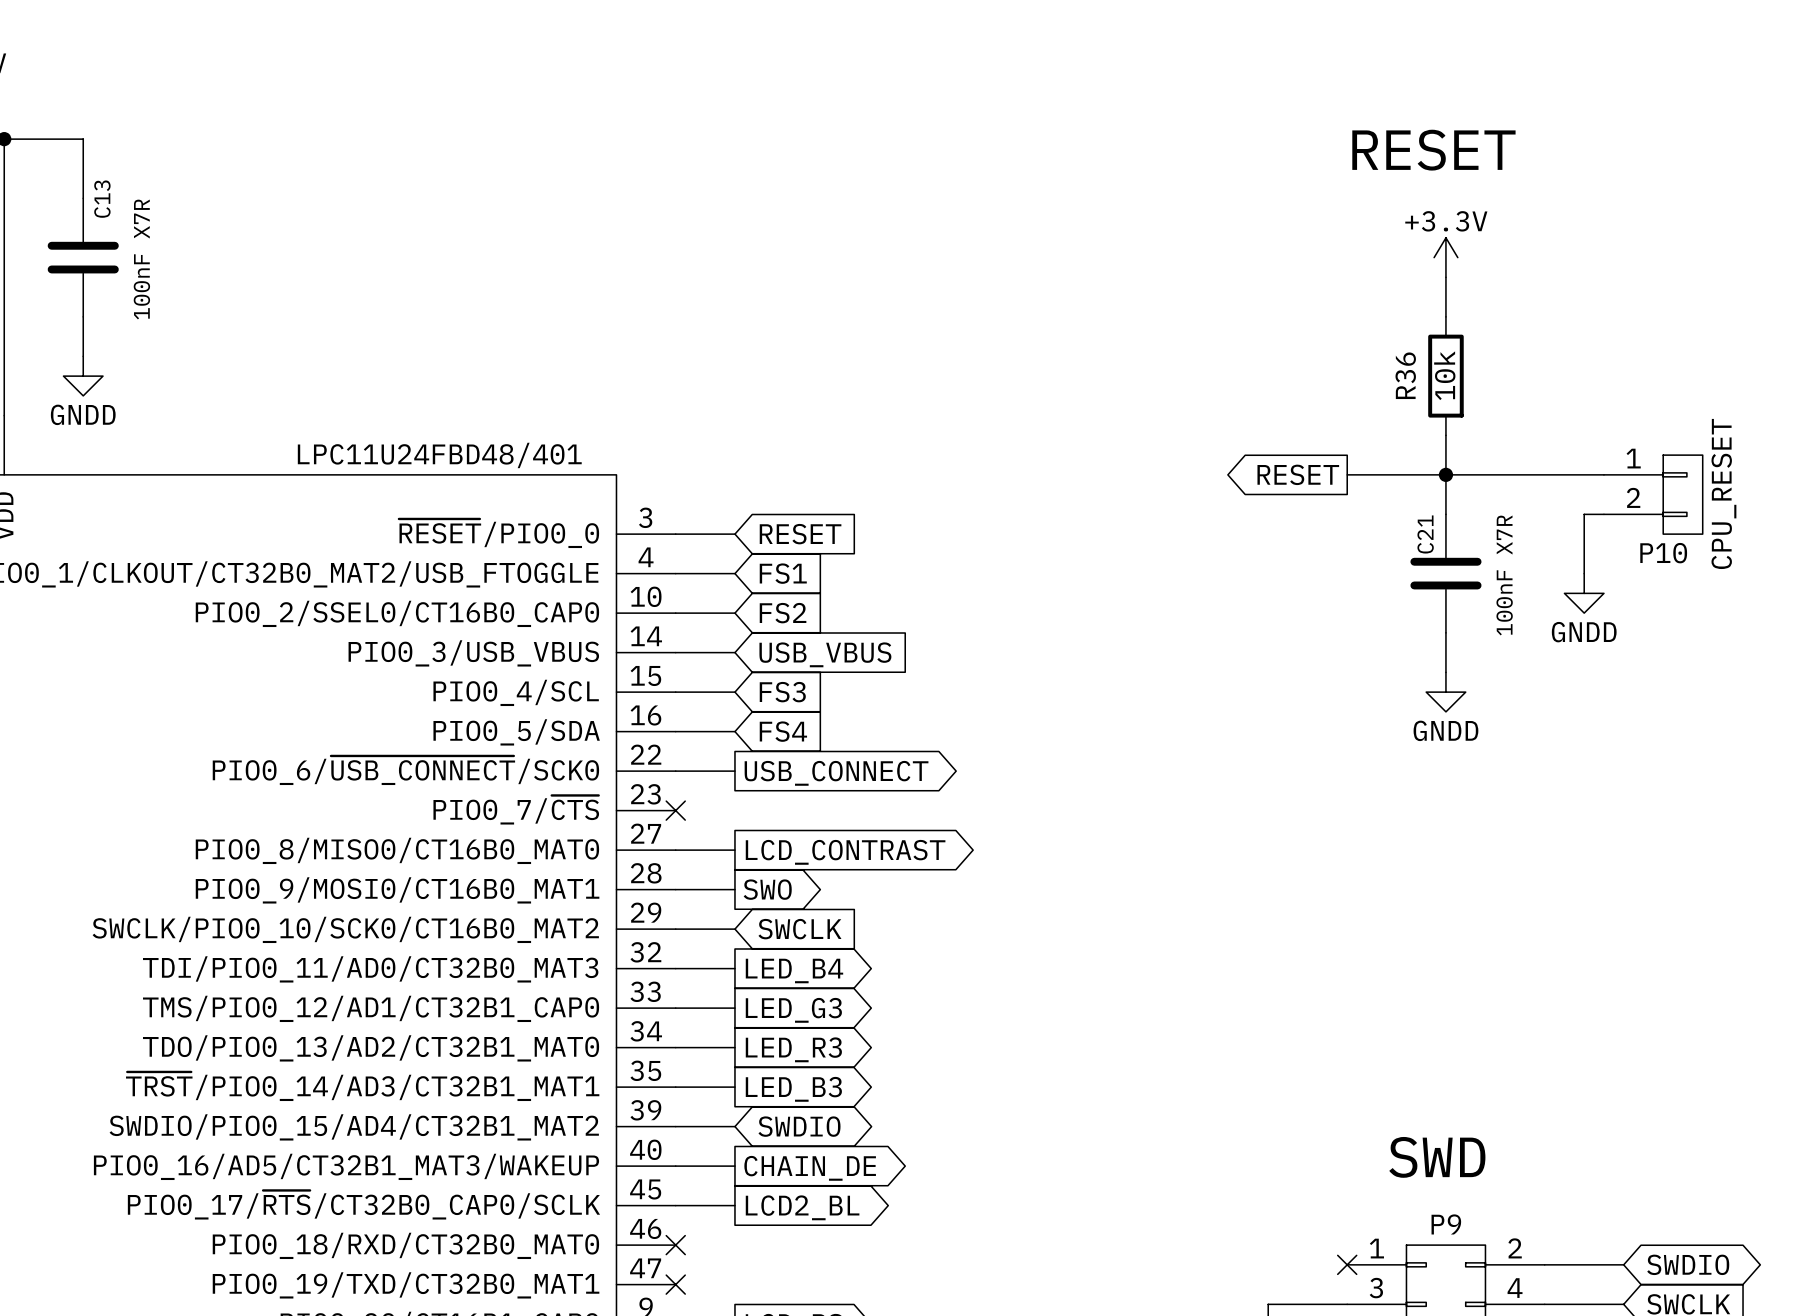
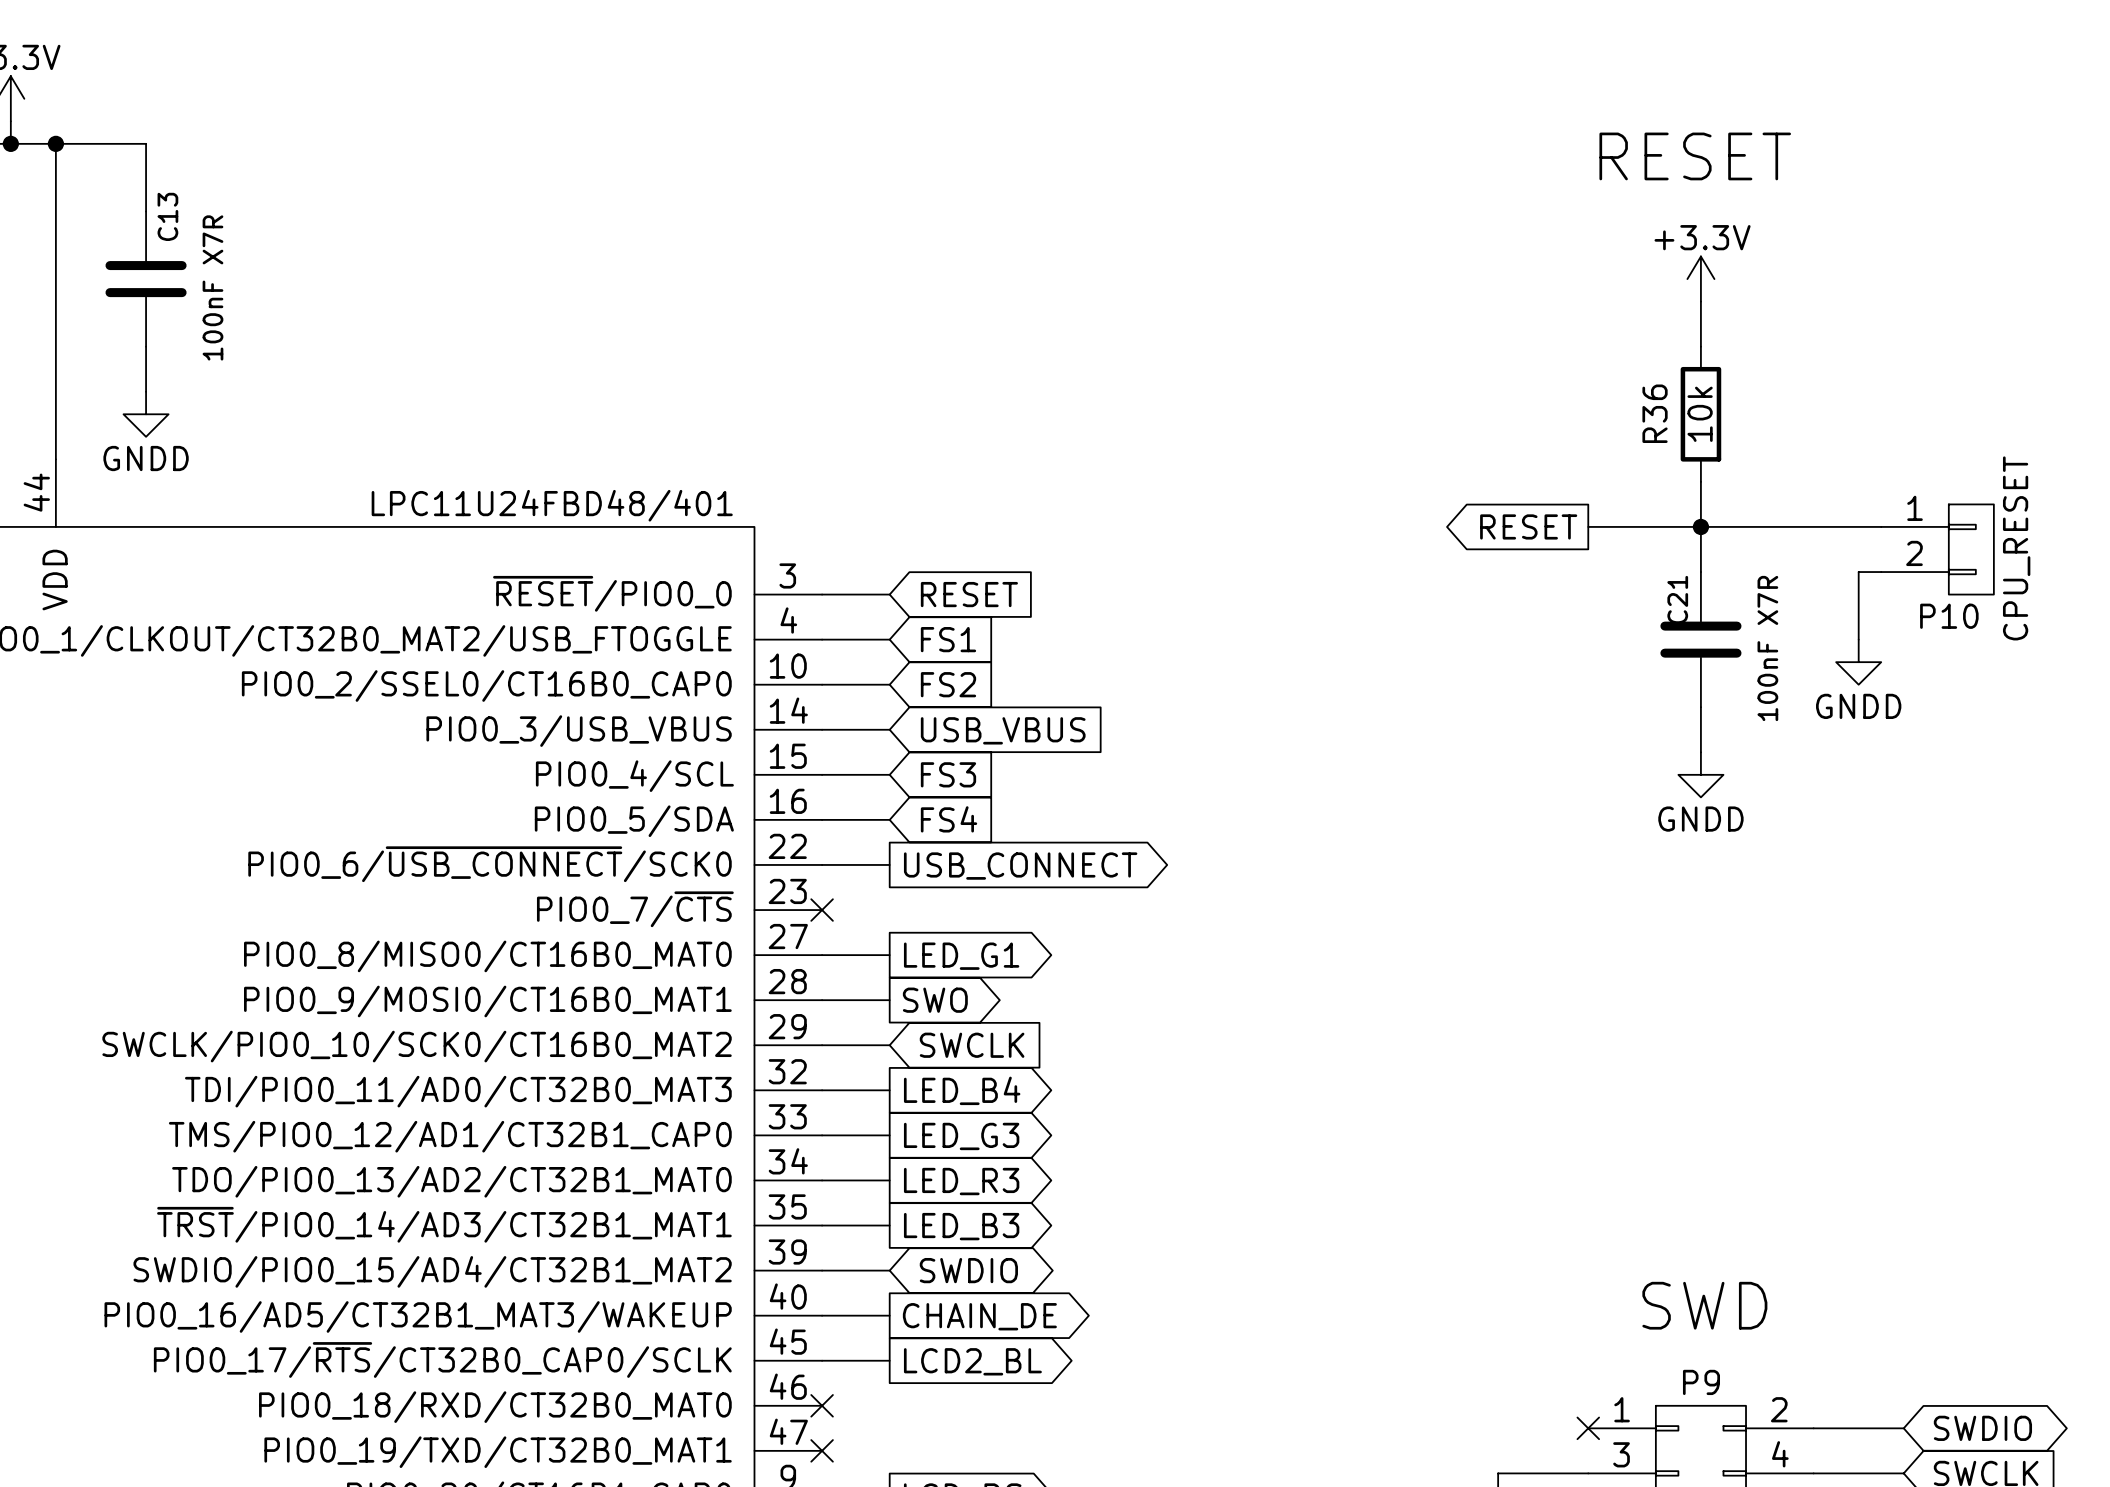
global label: LCD_CONTRAST (845, 852) -> LED_G1 (961, 956)

